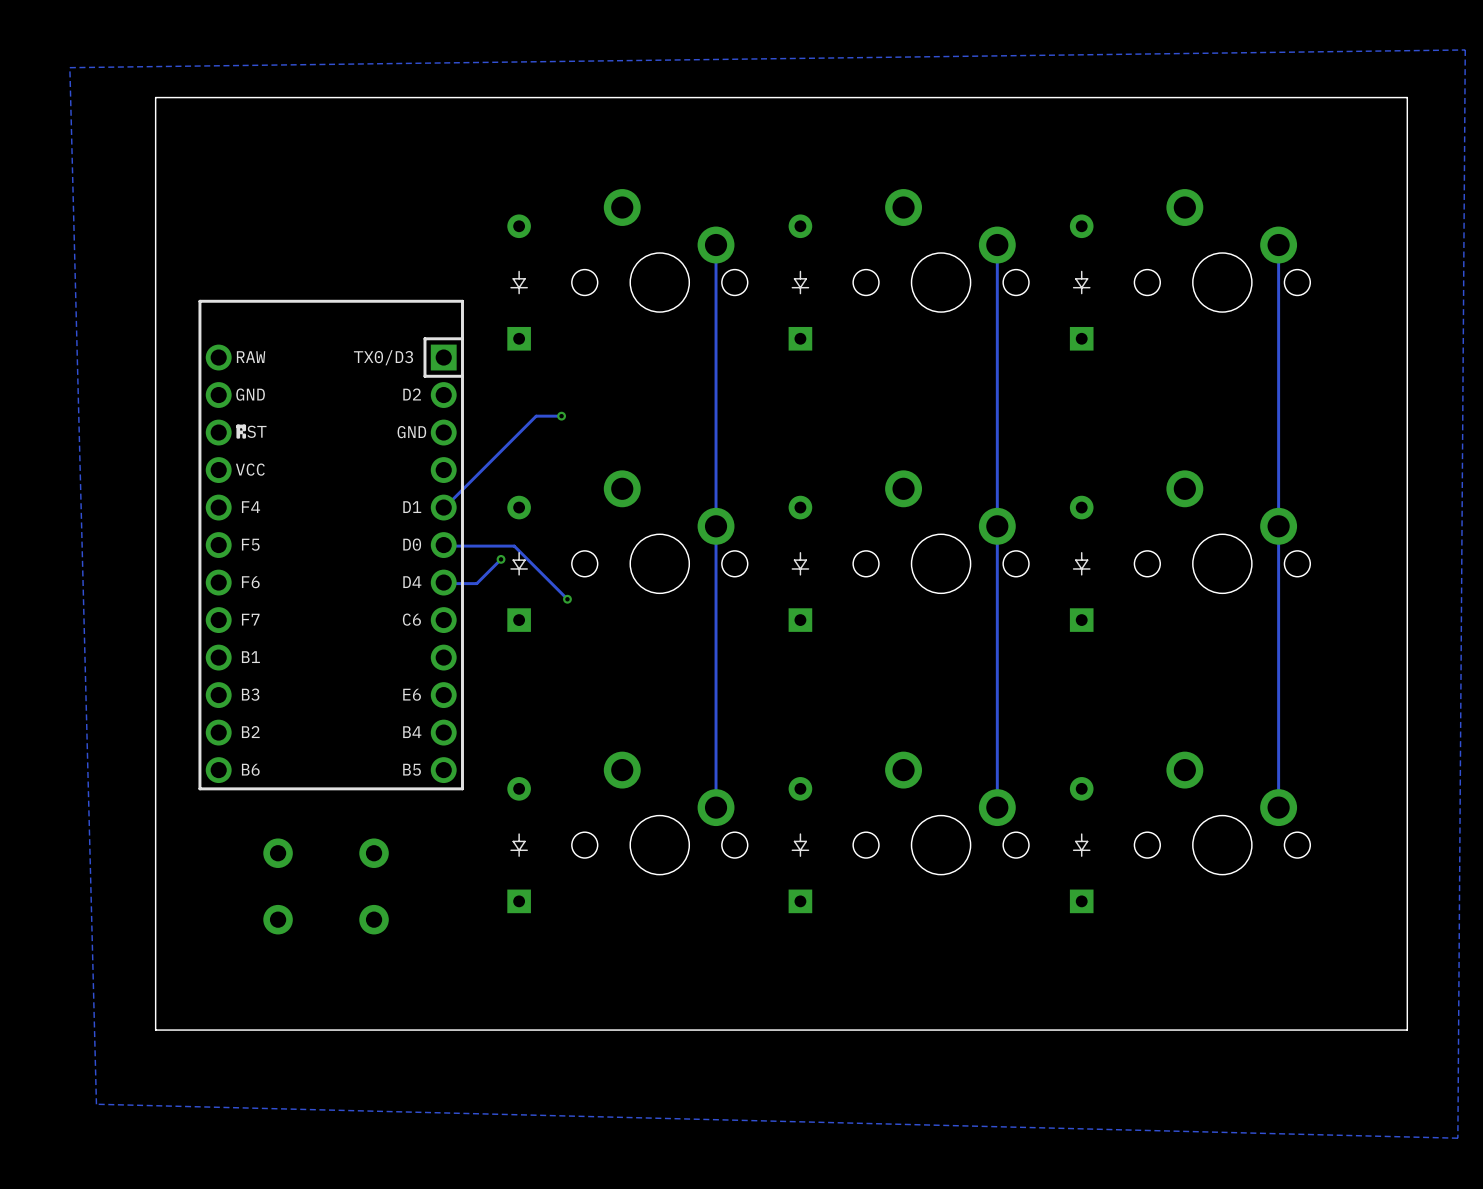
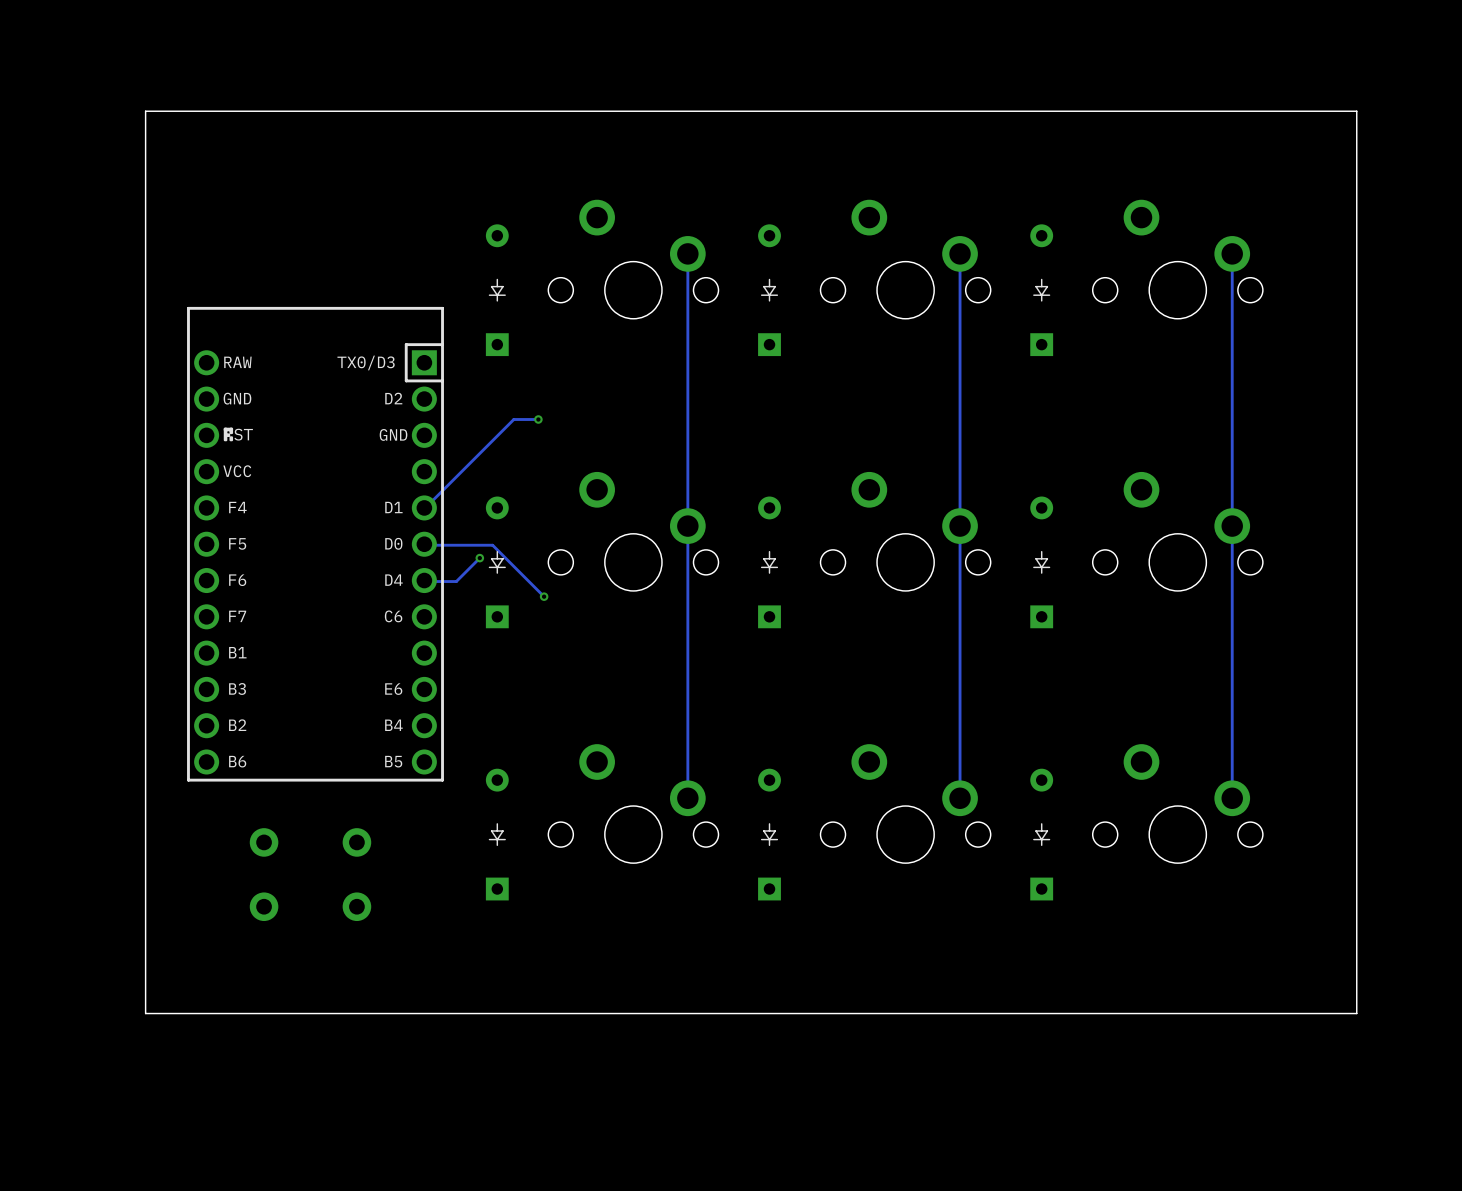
zone outline: (1465, 49) (1457, 1138) (96, 1104) (69, 67) (1465, 49) -> none

